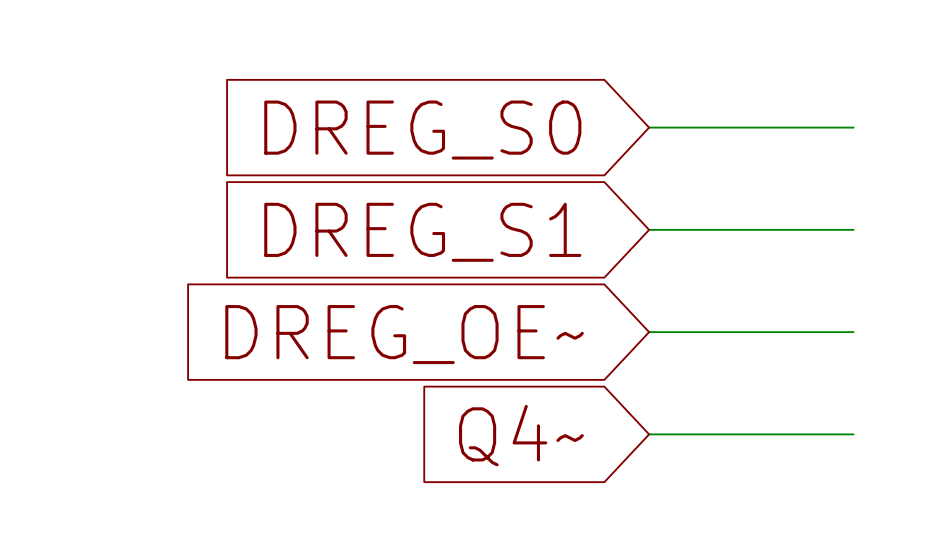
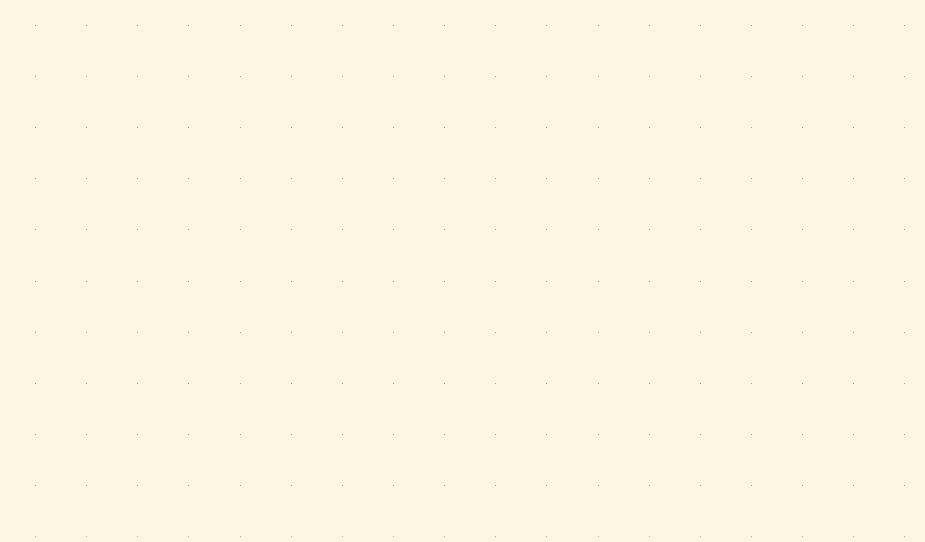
wire: (649, 127) (853, 127) -> none
global label: DREG_S0 (422, 130) -> none
wire: (649, 229) (853, 229) -> none
global label: DREG_S1 (422, 232) -> none
wire: (649, 332) (853, 332) -> none
global label: DREG_OE~ (404, 334) -> none
wire: (649, 434) (853, 434) -> none
global label: Q4~ (521, 435) -> none

